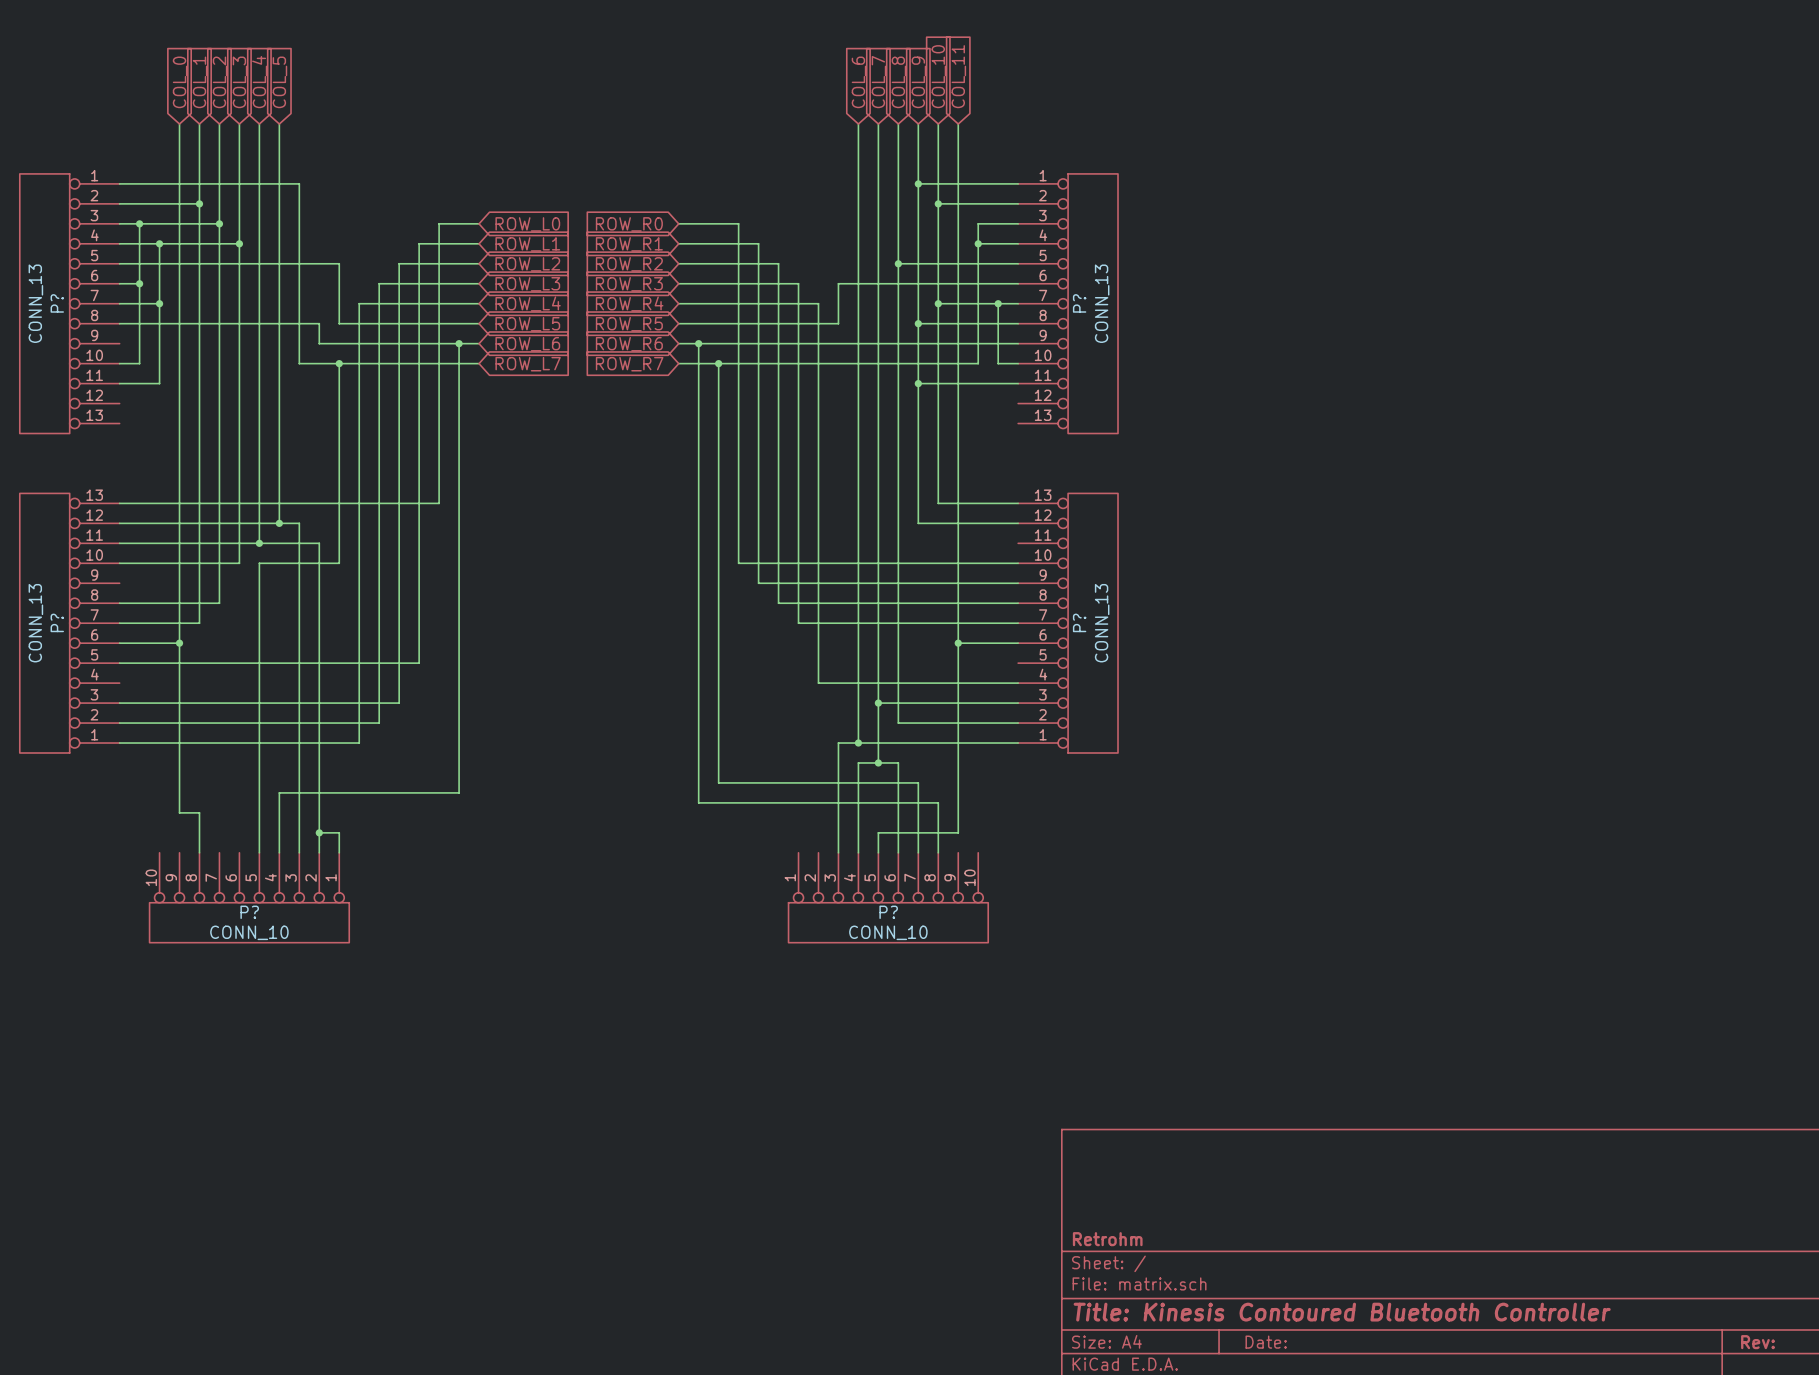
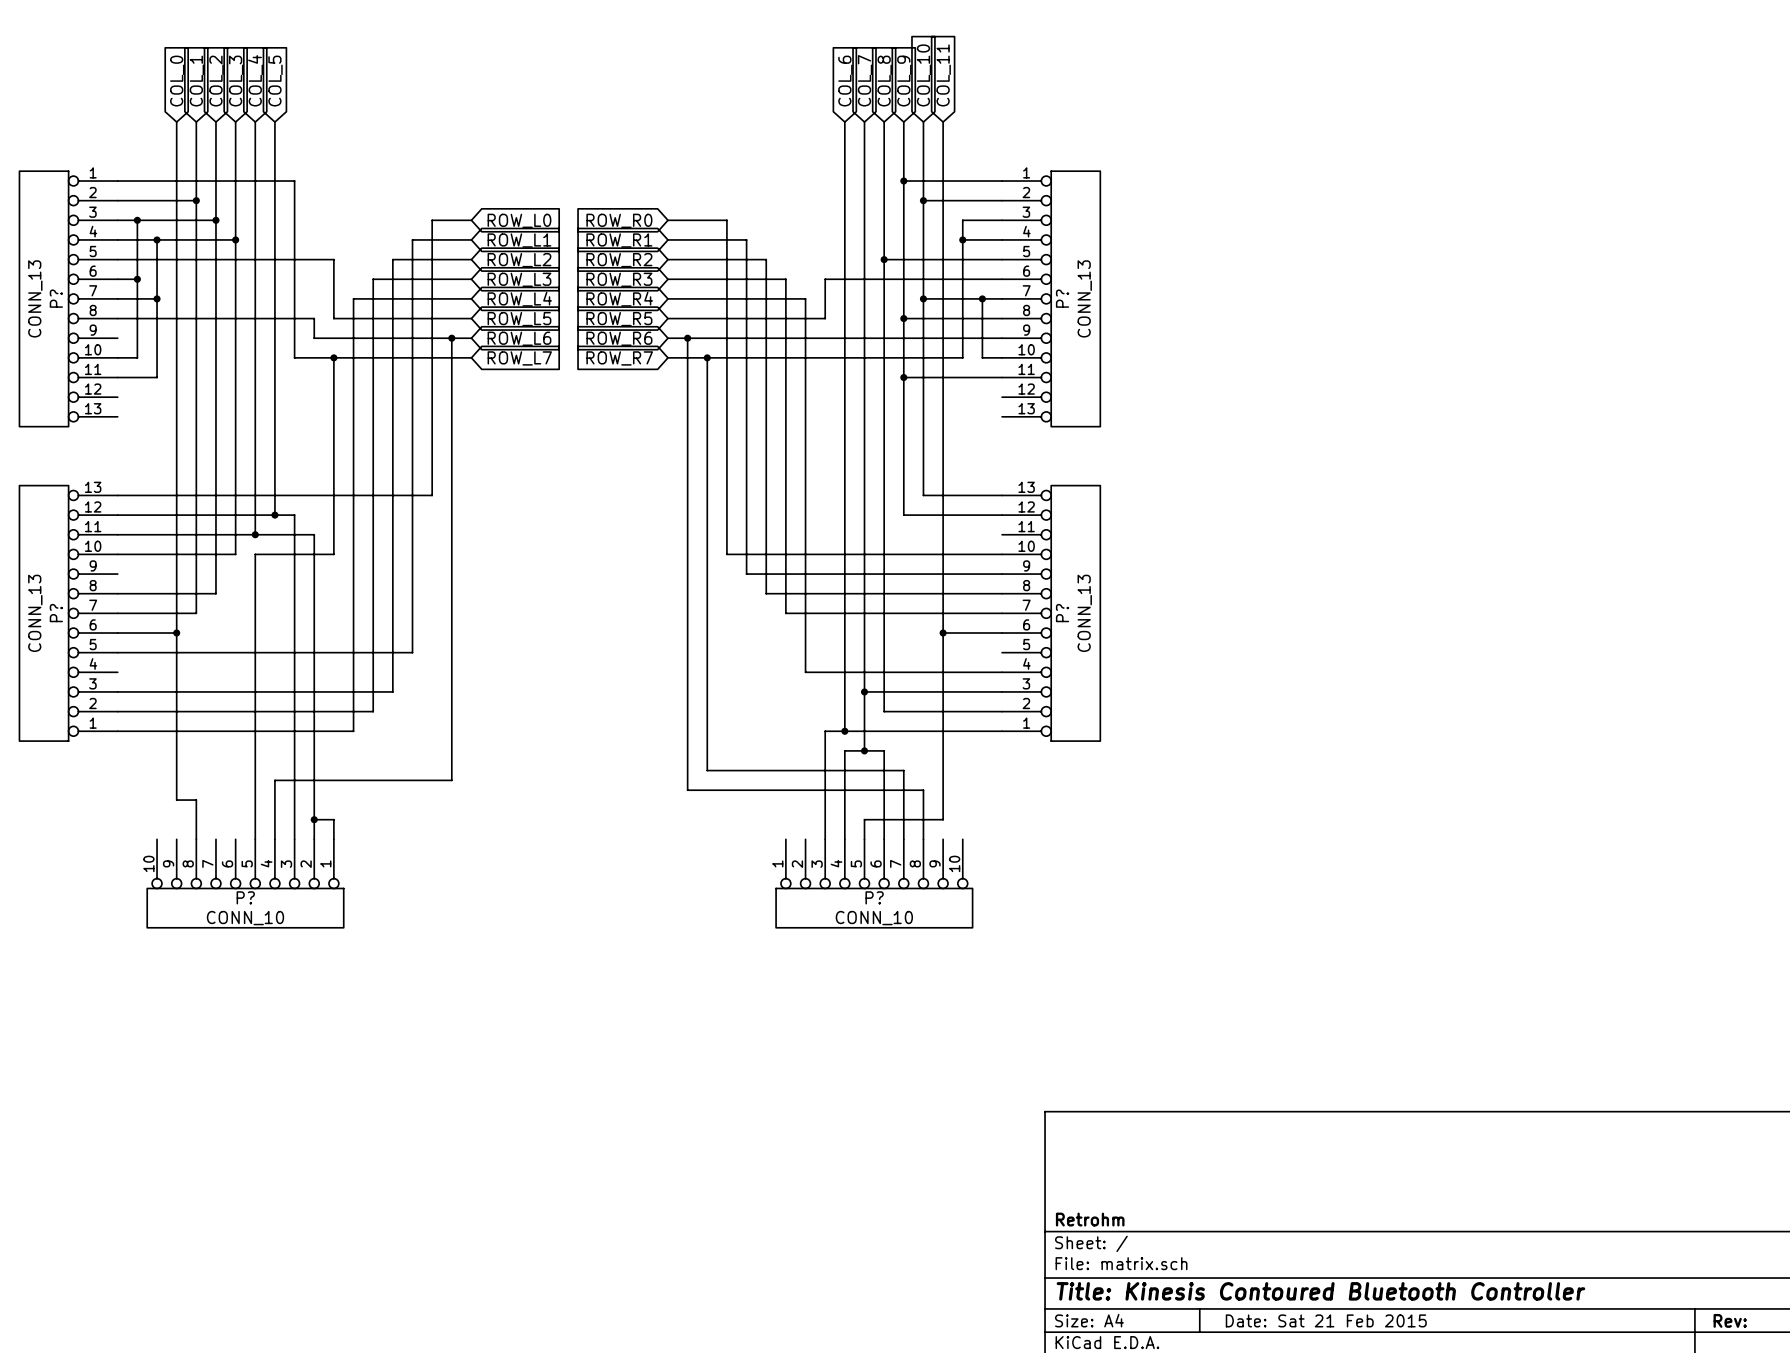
title block: Date: (1266, 1342) -> Date: Sat 21 Feb 2015 (1326, 1320)

